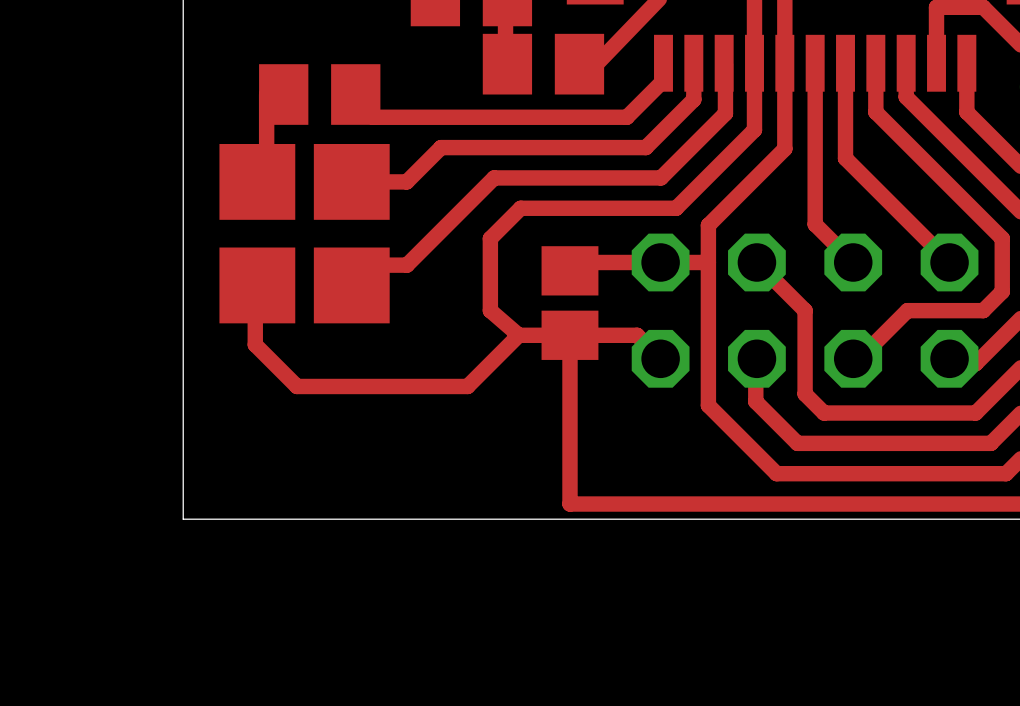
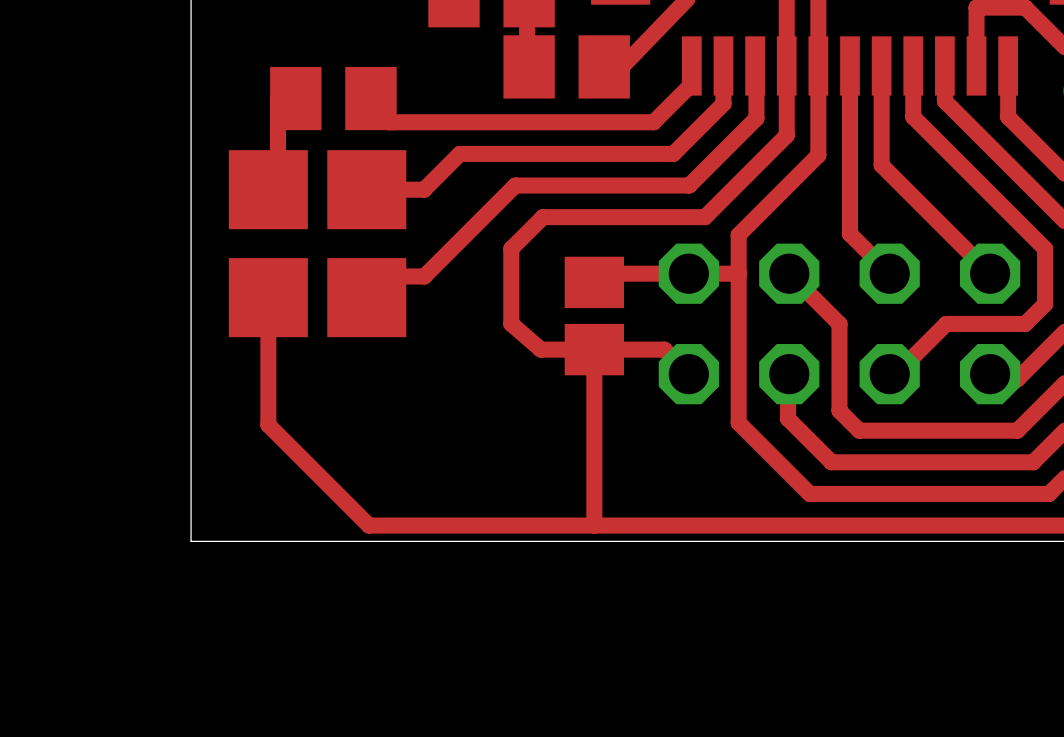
top track: (257, 285) (255, 285) (255, 344) (296, 386) (467, 386) (518, 335) -> (268, 297) (268, 424) (368, 525) (594, 525)

